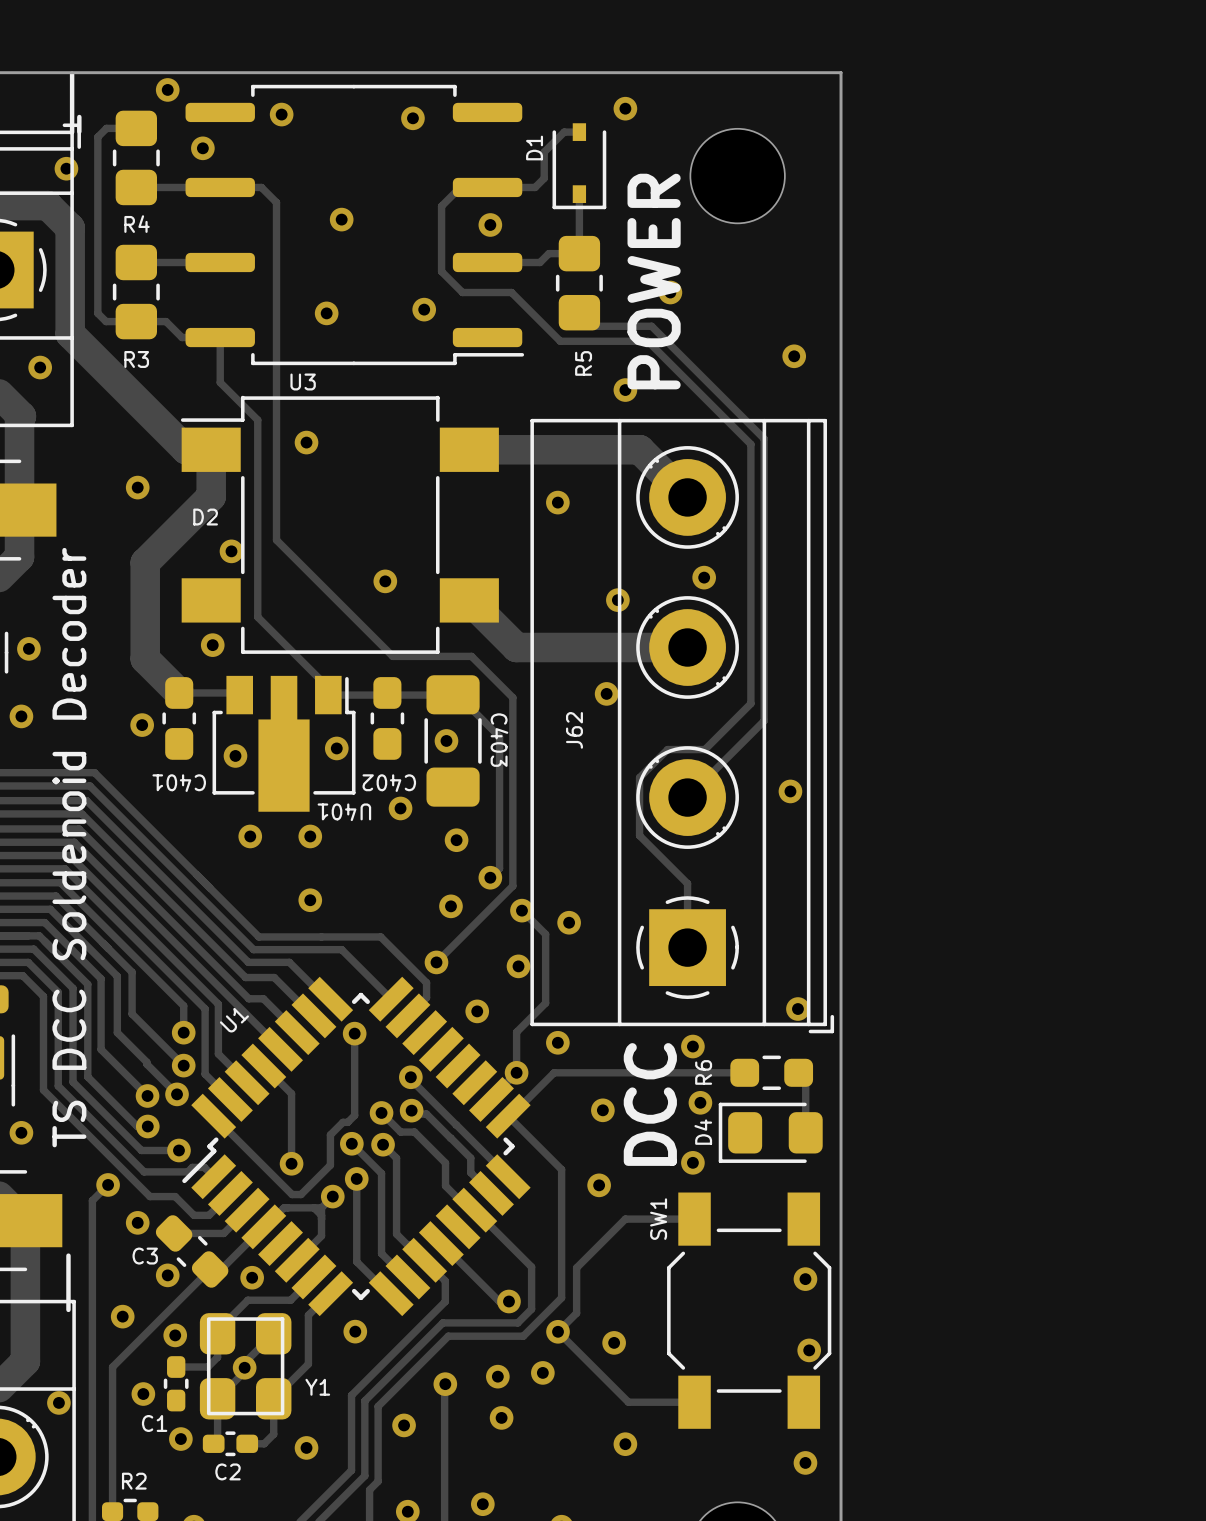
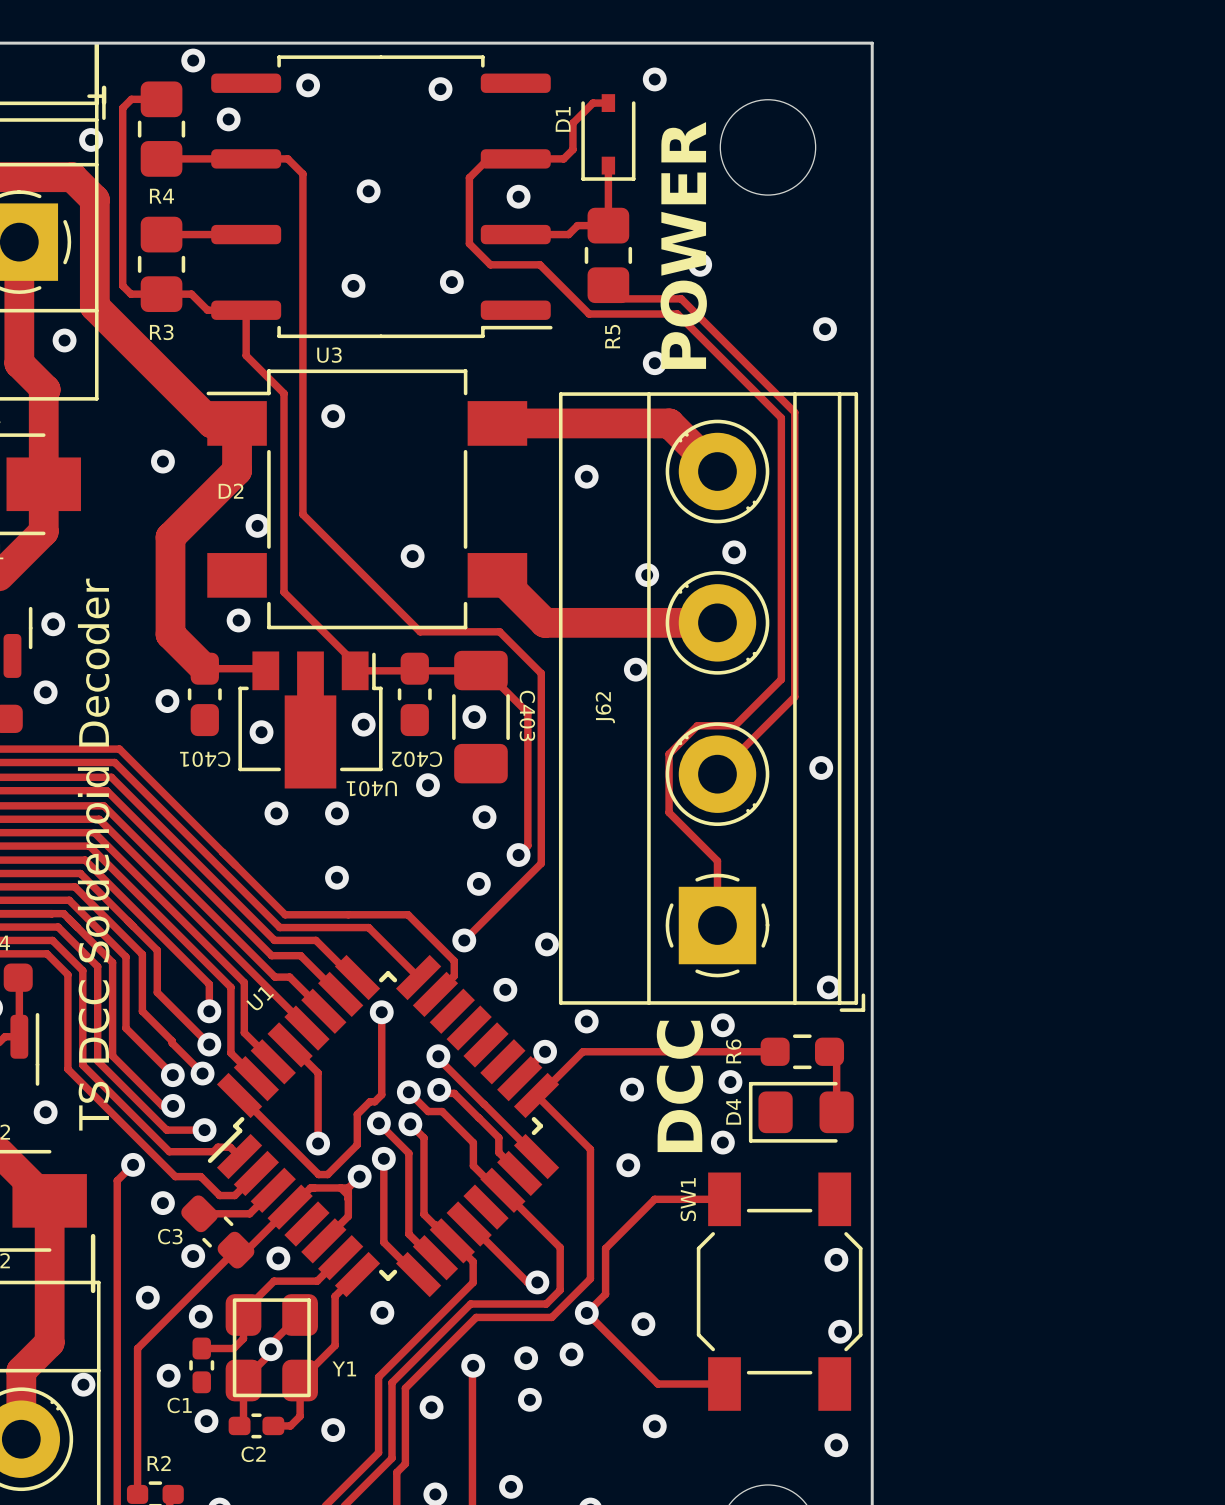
track: (521, 910) (545, 934) (545, 1003) (516, 1032) (516, 1072) -> none
via: (521, 910) -> none
via: (569, 922) -> none

